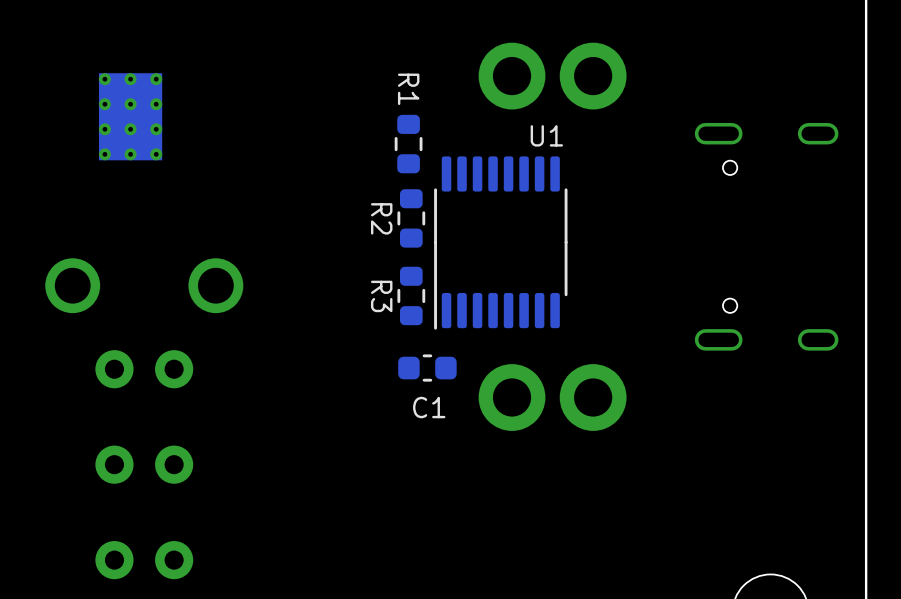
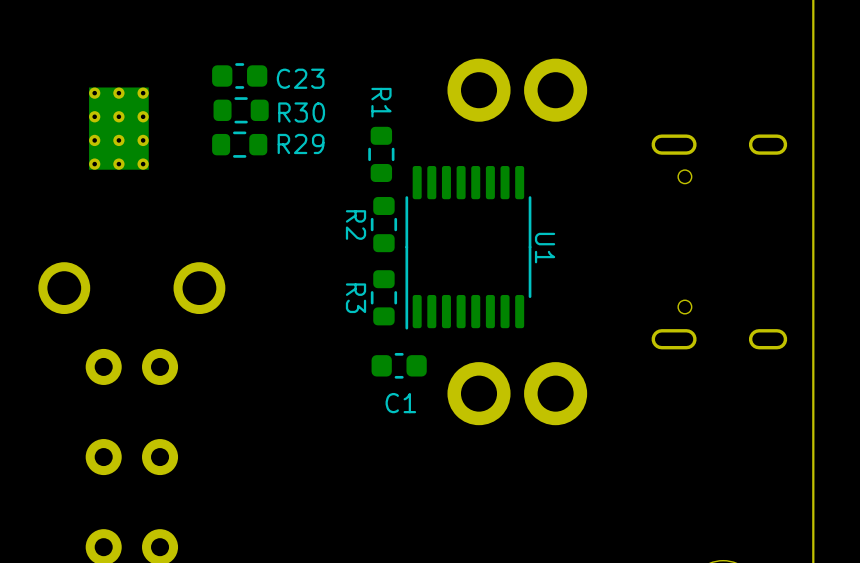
C23: none -> (239, 75)
R30: none -> (241, 110)
R29: none -> (239, 144)
U1 name rotation: 0° (546, 135) -> 90° clockwise (545, 248)
U1 name position: U1 (546, 135) -> U1 (545, 248)

